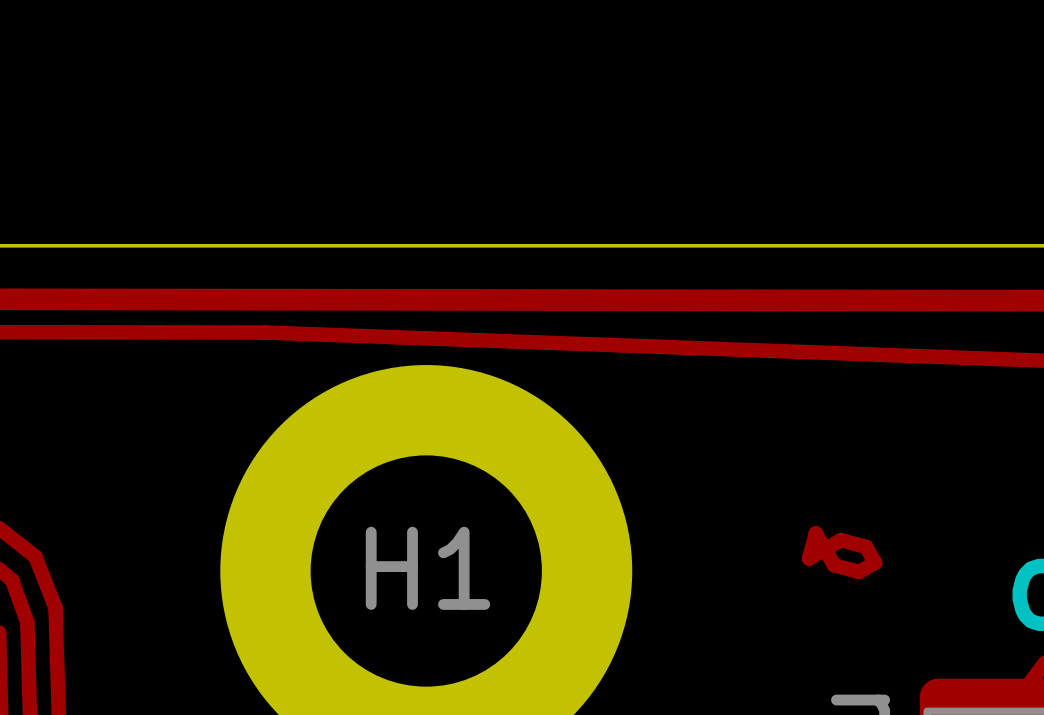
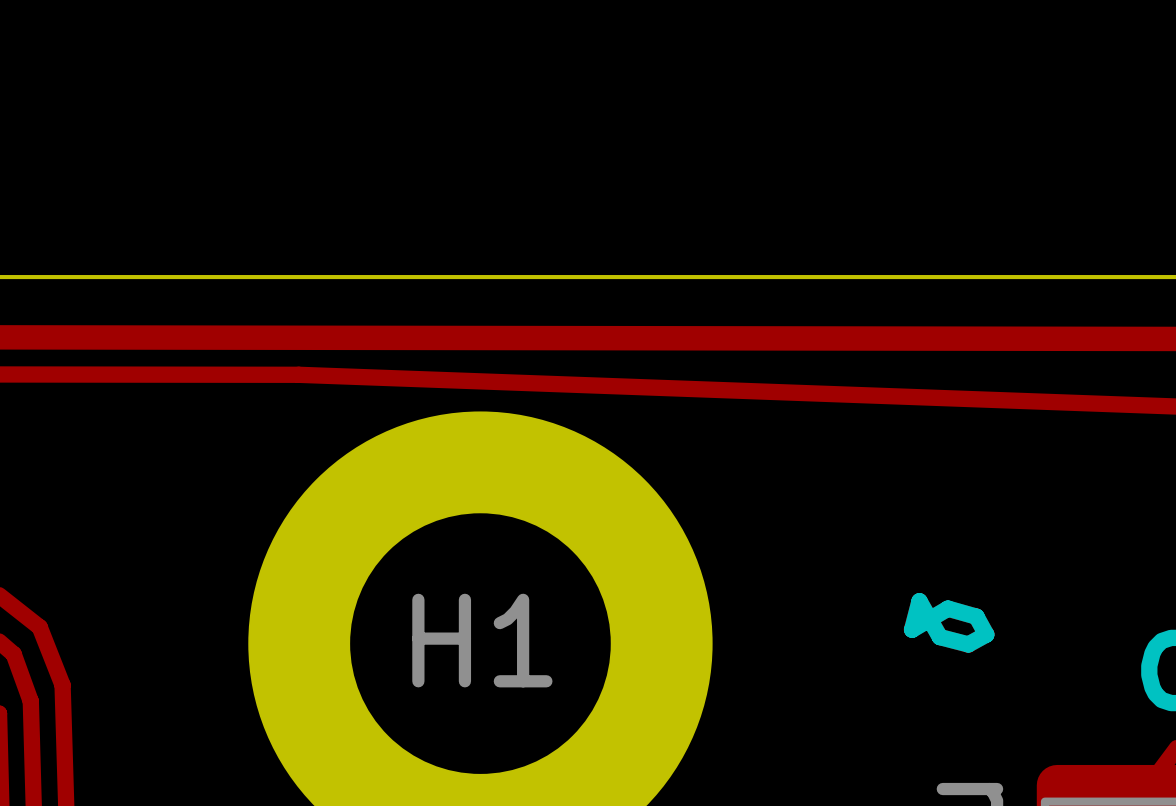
line: none -> (919, 601) (912, 629) (948, 608) (976, 616) (986, 634) (968, 644) (939, 637) (919, 601)

